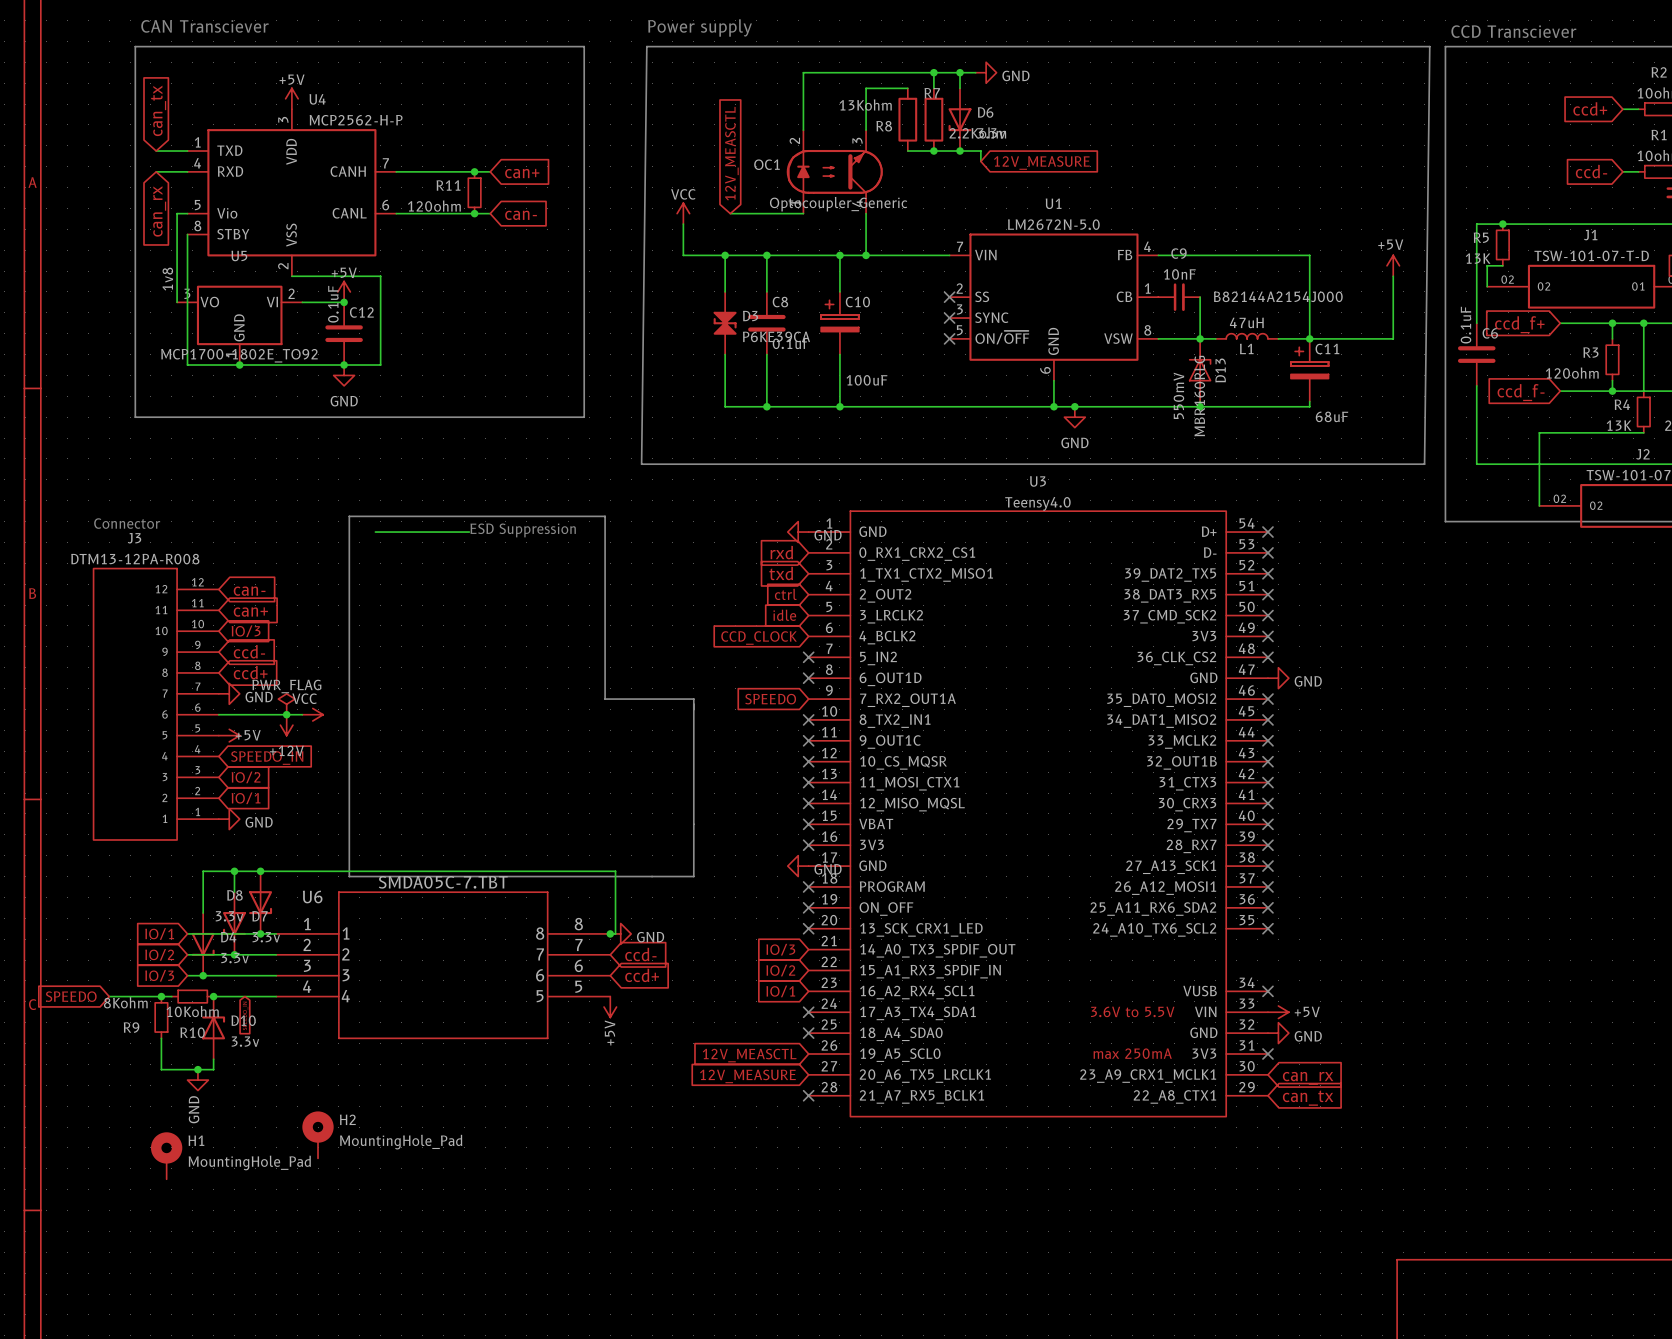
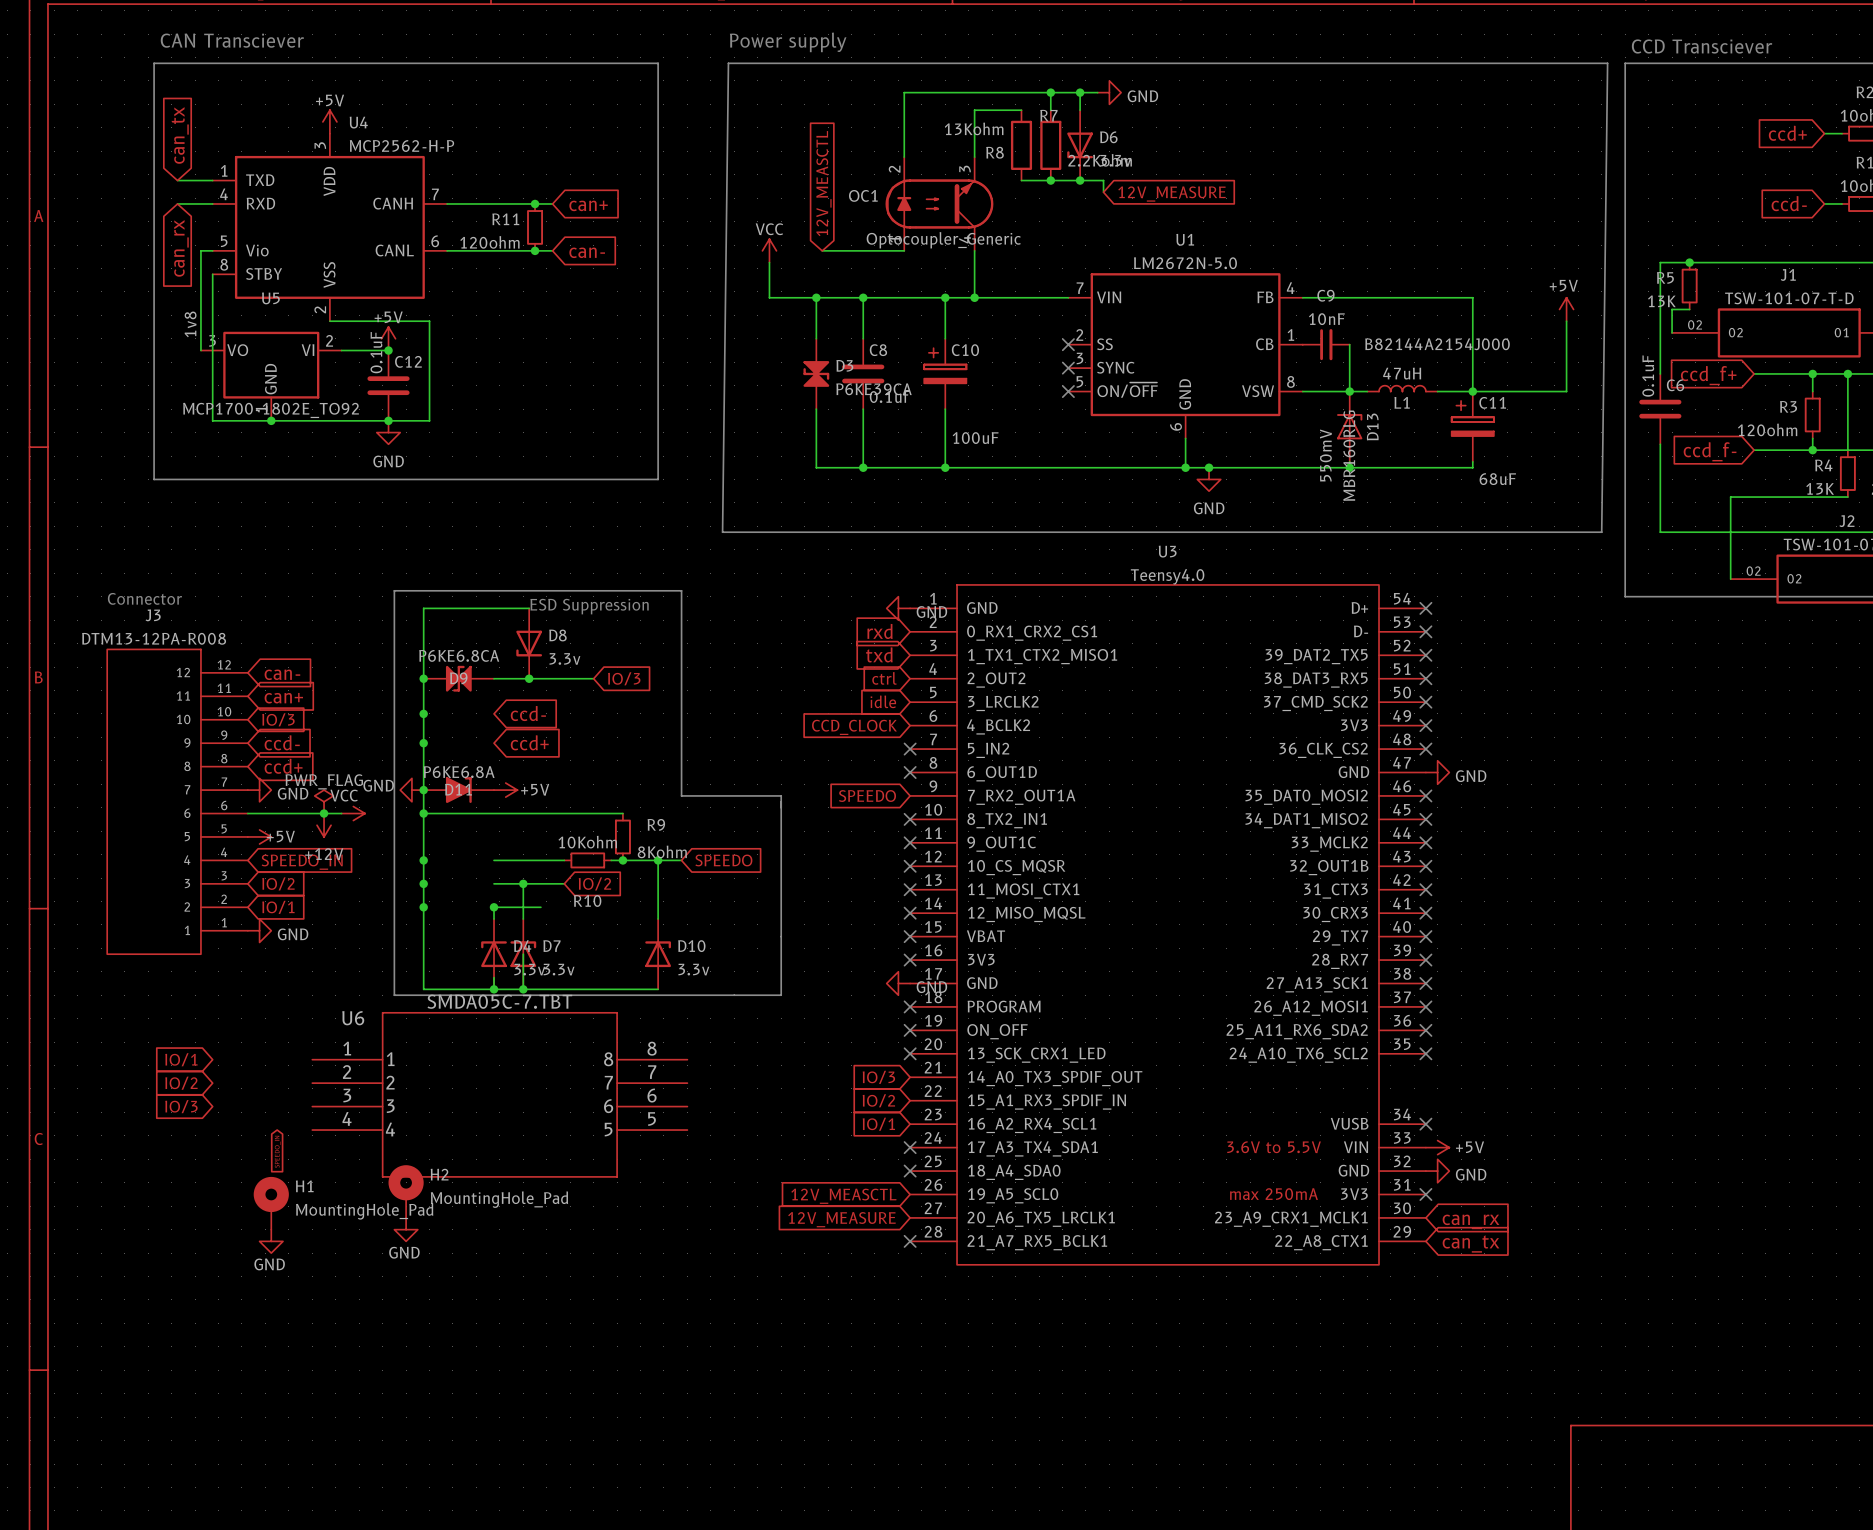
junction: none -> (423, 678)
D9: none -> P6KE6.8CA (458, 678)
wire: none -> (494, 678) (593, 678)
junction: none -> (529, 678)
global label: none -> IO/3 (624, 678)
junction: none -> (423, 713)
global label: none -> ccd- (528, 713)
global label: none -> ccd+ (529, 742)
junction: none -> (423, 743)
power symbol: none -> GND (411, 790)
junction: none -> (423, 790)
D11: none -> P6KE6.8A (458, 790)
power symbol: none -> +5V (505, 790)
wire: none -> (423, 813) (622, 813)
junction: none -> (423, 813)
junction: none -> (423, 860)
wire: none -> (494, 860) (564, 860)
wire: none -> (611, 860) (681, 860)
junction: none -> (622, 860)
wire: none -> (658, 860) (658, 919)
junction: none -> (658, 860)
global label: none -> SPEEDO (723, 860)
junction: none -> (423, 883)
wire: none -> (494, 883) (564, 883)
wire: none -> (523, 883) (523, 919)
junction: none -> (523, 883)
global label: none -> IO/2 (594, 883)
junction: none -> (423, 907)
junction: none -> (494, 907)
wire: none -> (540, 907) (494, 907) (494, 919)
wire: none -> (523, 954) (523, 989)
wire: none -> (494, 977) (494, 989)
wire: (234, 871) (234, 892) -> none
junction: (234, 871) -> none
junction: (260, 871) -> none
wire: (375, 871) (203, 871) (203, 913) -> (423, 989) (423, 608)
junction: none -> (494, 989)
junction: none -> (523, 989)
wire: (584, 871) (615, 871) (615, 933) (610, 933) -> none
D8 flip: as is (260, 902) -> left-right (529, 643)
D8 position: (260, 902) -> (529, 643)
D7 rotation: 0° (234, 923) -> 180° (523, 954)
D7 position: (234, 923) -> (523, 954)
wire: (187, 933) (276, 933) -> none
junction: (260, 933) -> none
junction: (610, 933) -> none
power symbol: GND (620, 933) -> none
D4 rotation: 0° (203, 944) -> 180° (494, 954)
D4 position: (203, 944) -> (494, 954)
wire: (187, 954) (276, 954) -> none
junction: (234, 954) -> none
global label: ccd- (640, 954) -> none
wire: (187, 975) (276, 975) -> none
junction: (203, 975) -> none
global label: ccd+ (642, 975) -> none
global label: SPEEDO (71, 996) -> none
wire: (109, 996) (171, 996) -> none
junction: (161, 996) -> none
R10 position: (192, 996) -> (587, 860)
wire: (213, 996) (276, 996) -> none
junction: (213, 996) -> none
R9 value position: 8Kohm (125, 1002) -> 8Kohm (662, 851)
power symbol: +5V (610, 1007) -> none
R10 value position: 10Kohm (192, 1011) -> 10Kohm (587, 842)
R9 position: (161, 1017) -> (622, 836)
R9 name position: R9 (131, 1027) -> R9 (656, 824)
D10 position: (213, 1027) -> (658, 954)
wire: (161, 1038) (161, 1069) (213, 1069) (213, 1059) -> none
junction: (197, 1069) -> none
power symbol position: GND (197, 1080) -> GND (271, 1241)
power symbol: none -> GND (406, 1229)
power symbol text rotation: 0° (194, 1109) -> 90° clockwise (269, 1264)
H2 position: (318, 1134) -> (406, 1191)
H1 position: (166, 1155) -> (271, 1203)

